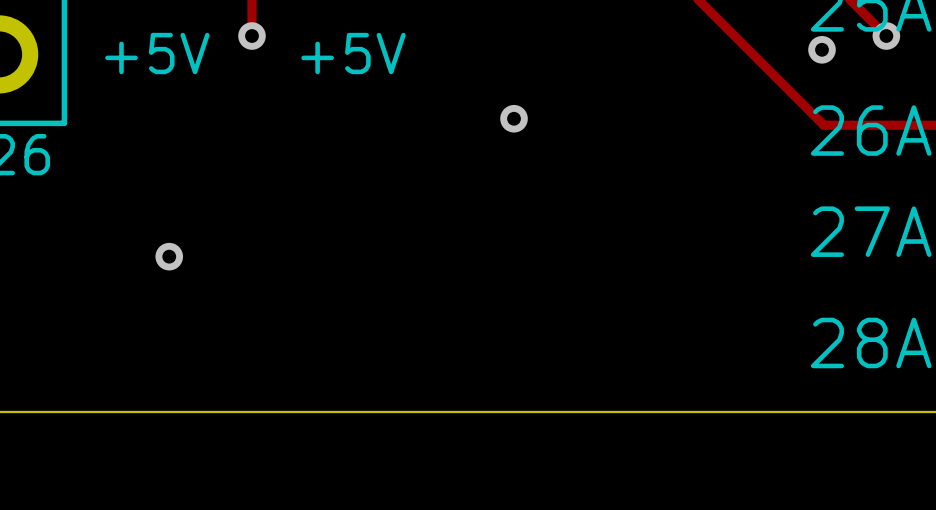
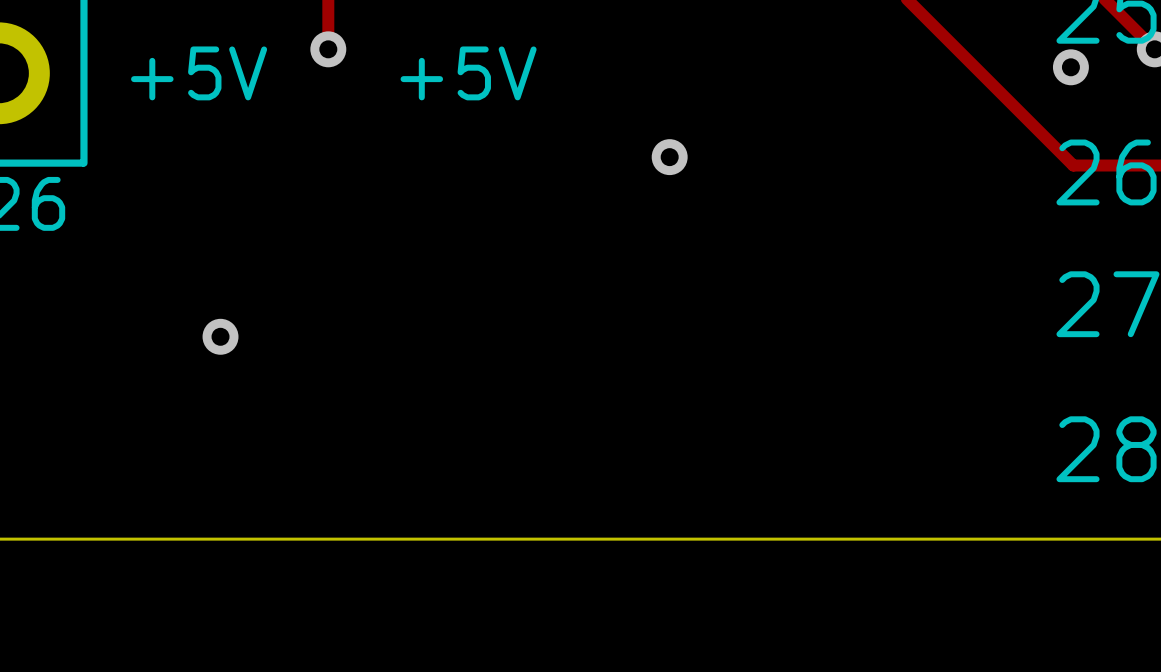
text: +5V +5V (255, 53) -> +5V (199, 73)
text: none -> +5V (468, 73)

